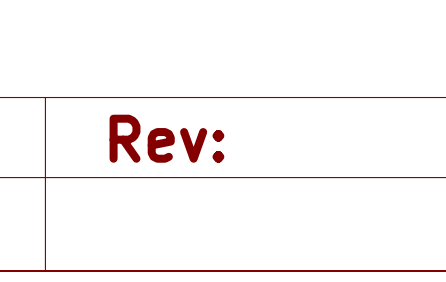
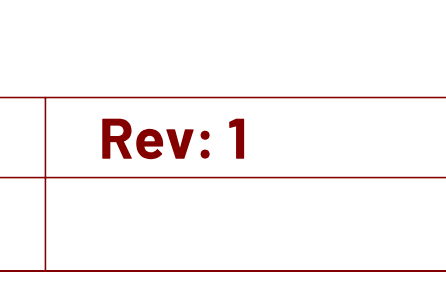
title block: Rev: (166, 138) -> Rev: 1 (173, 138)

